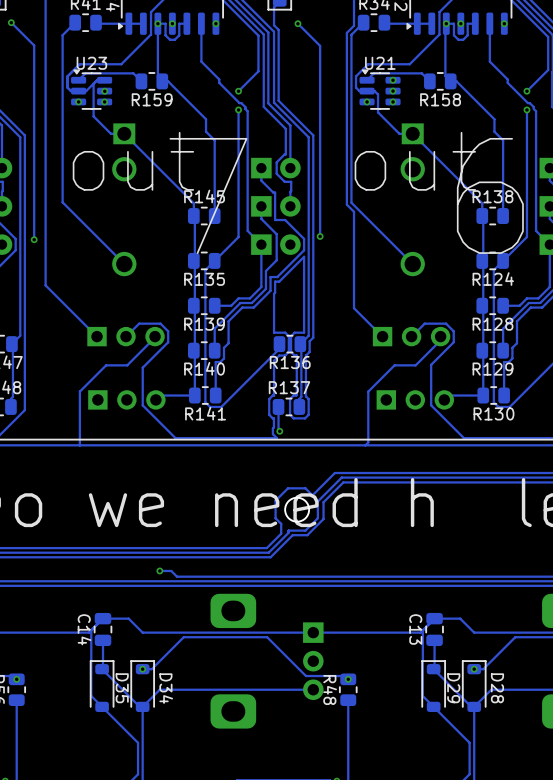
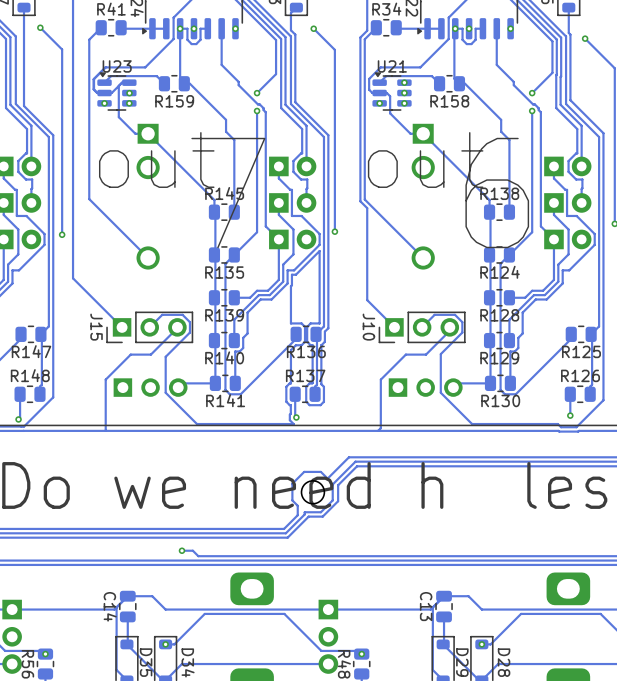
J15 side: top (126, 336) -> bottom (149, 327)
J10 side: top (411, 336) -> bottom (422, 327)

